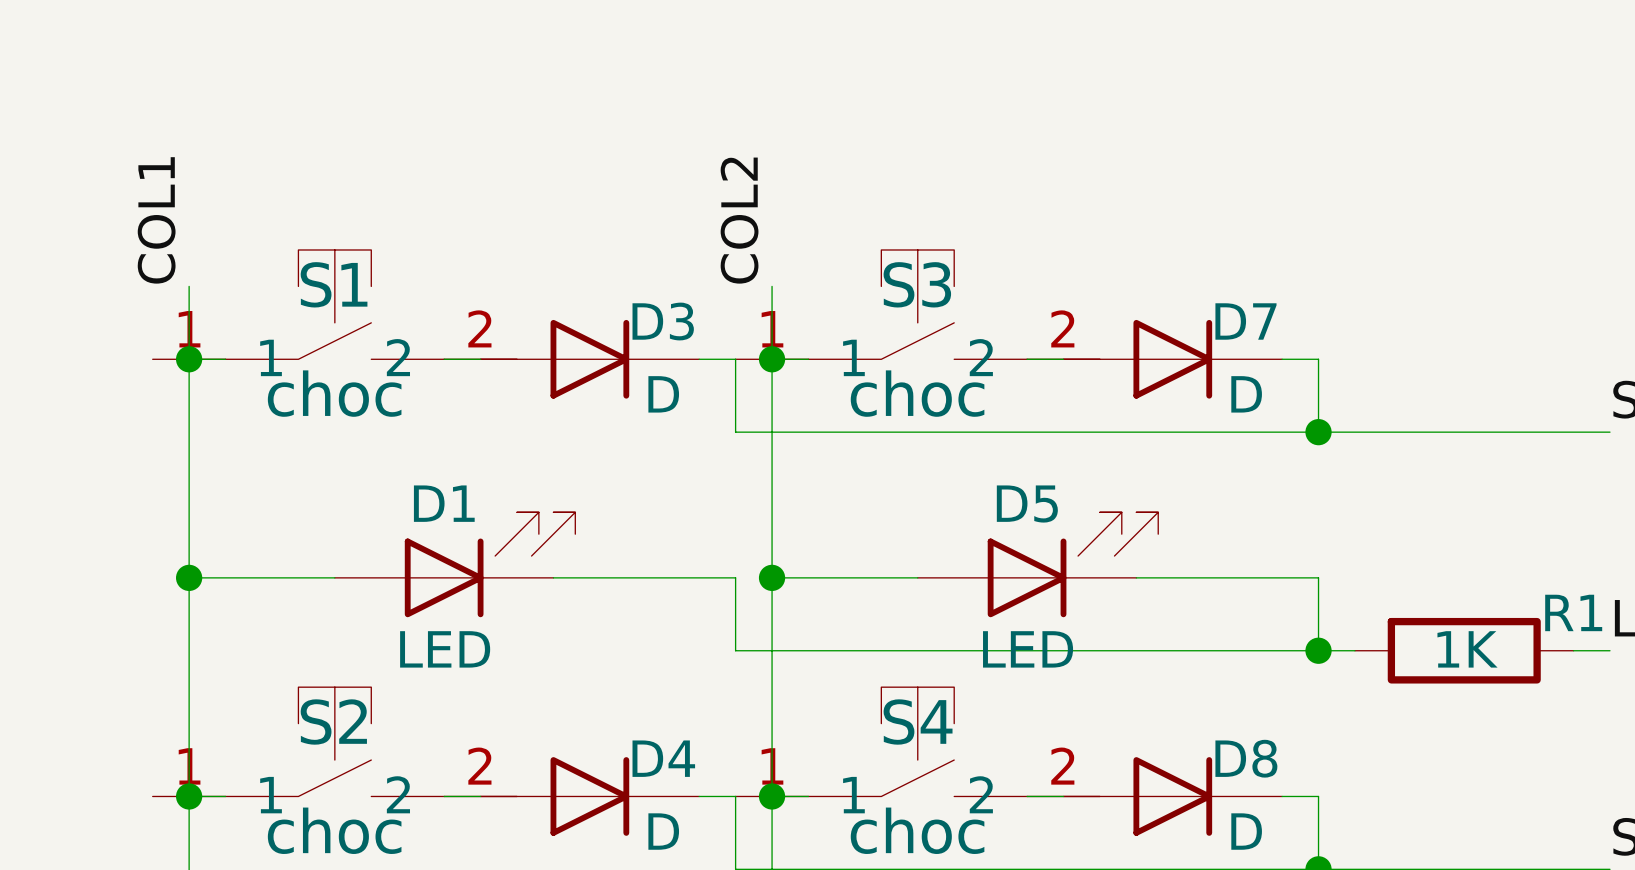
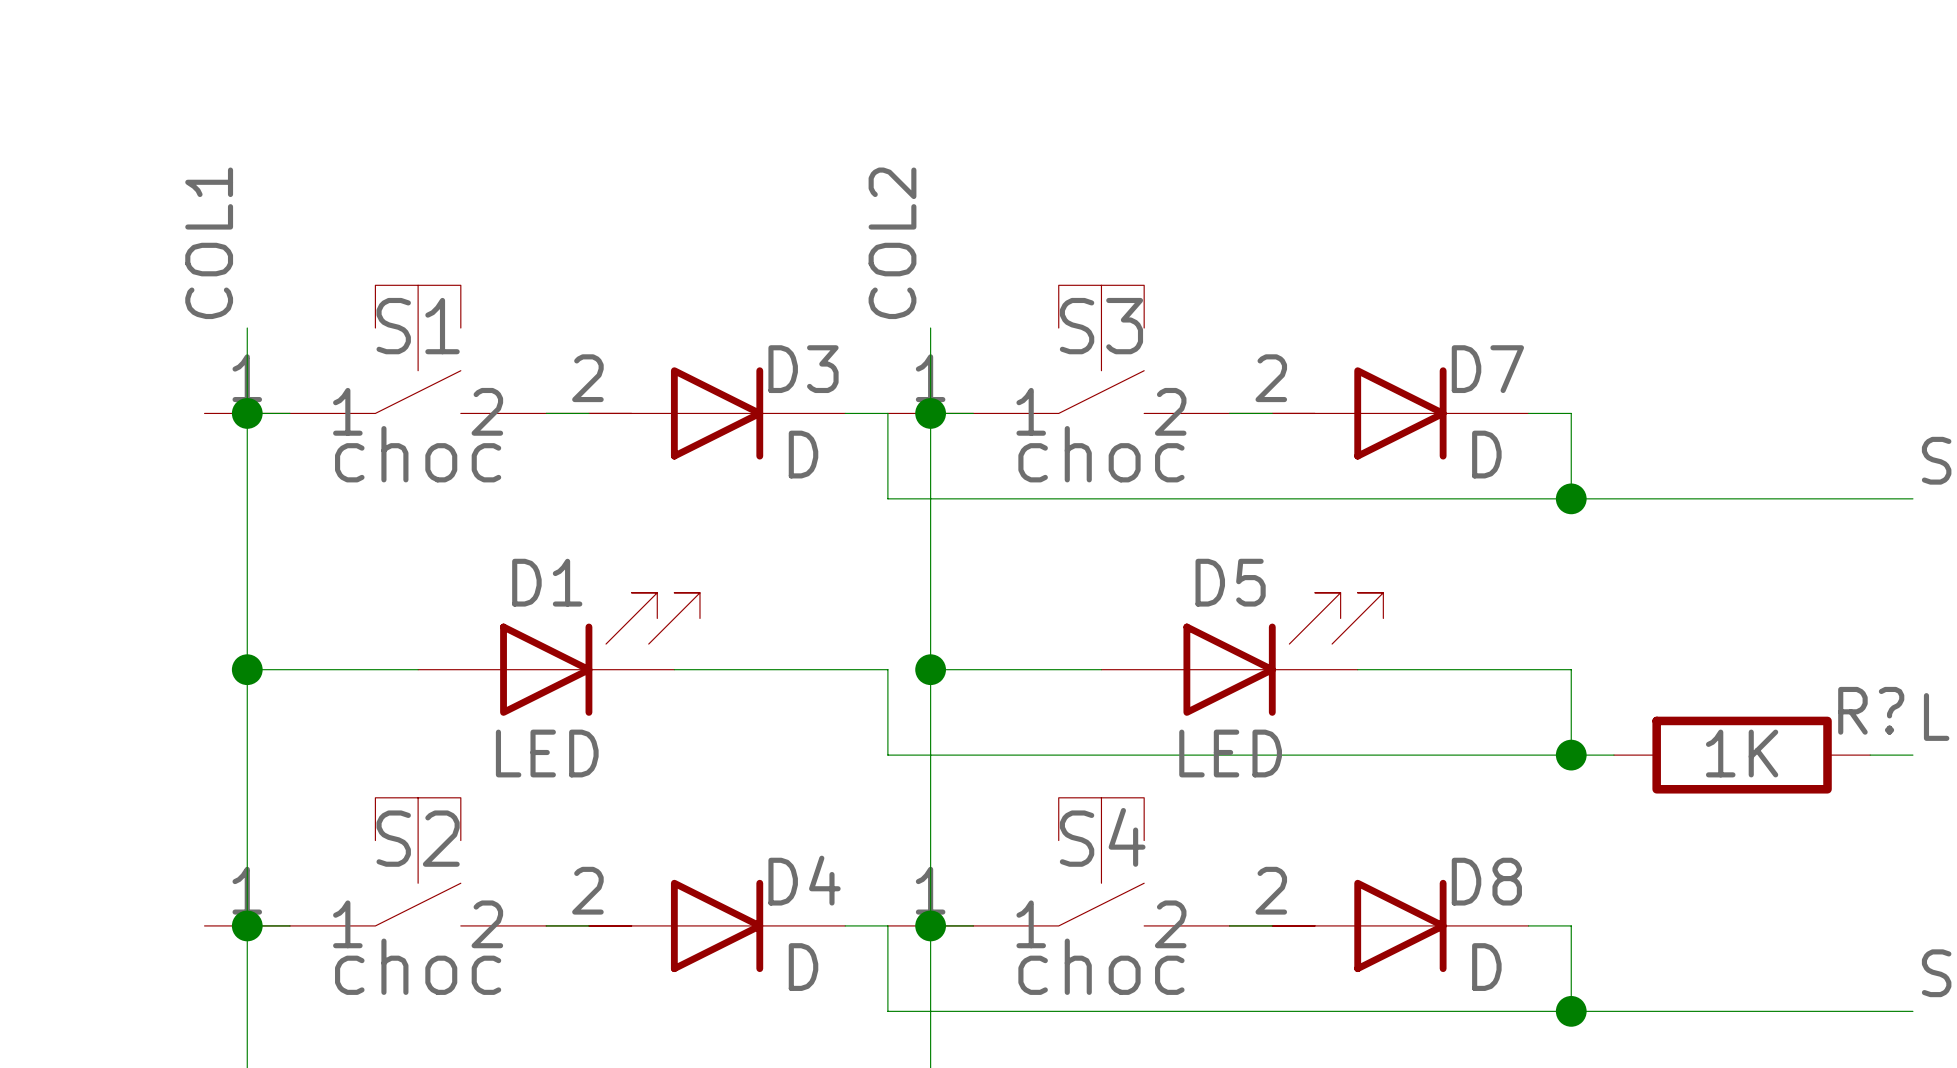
R1 name: R1 (1573, 612) -> R? (1871, 710)

